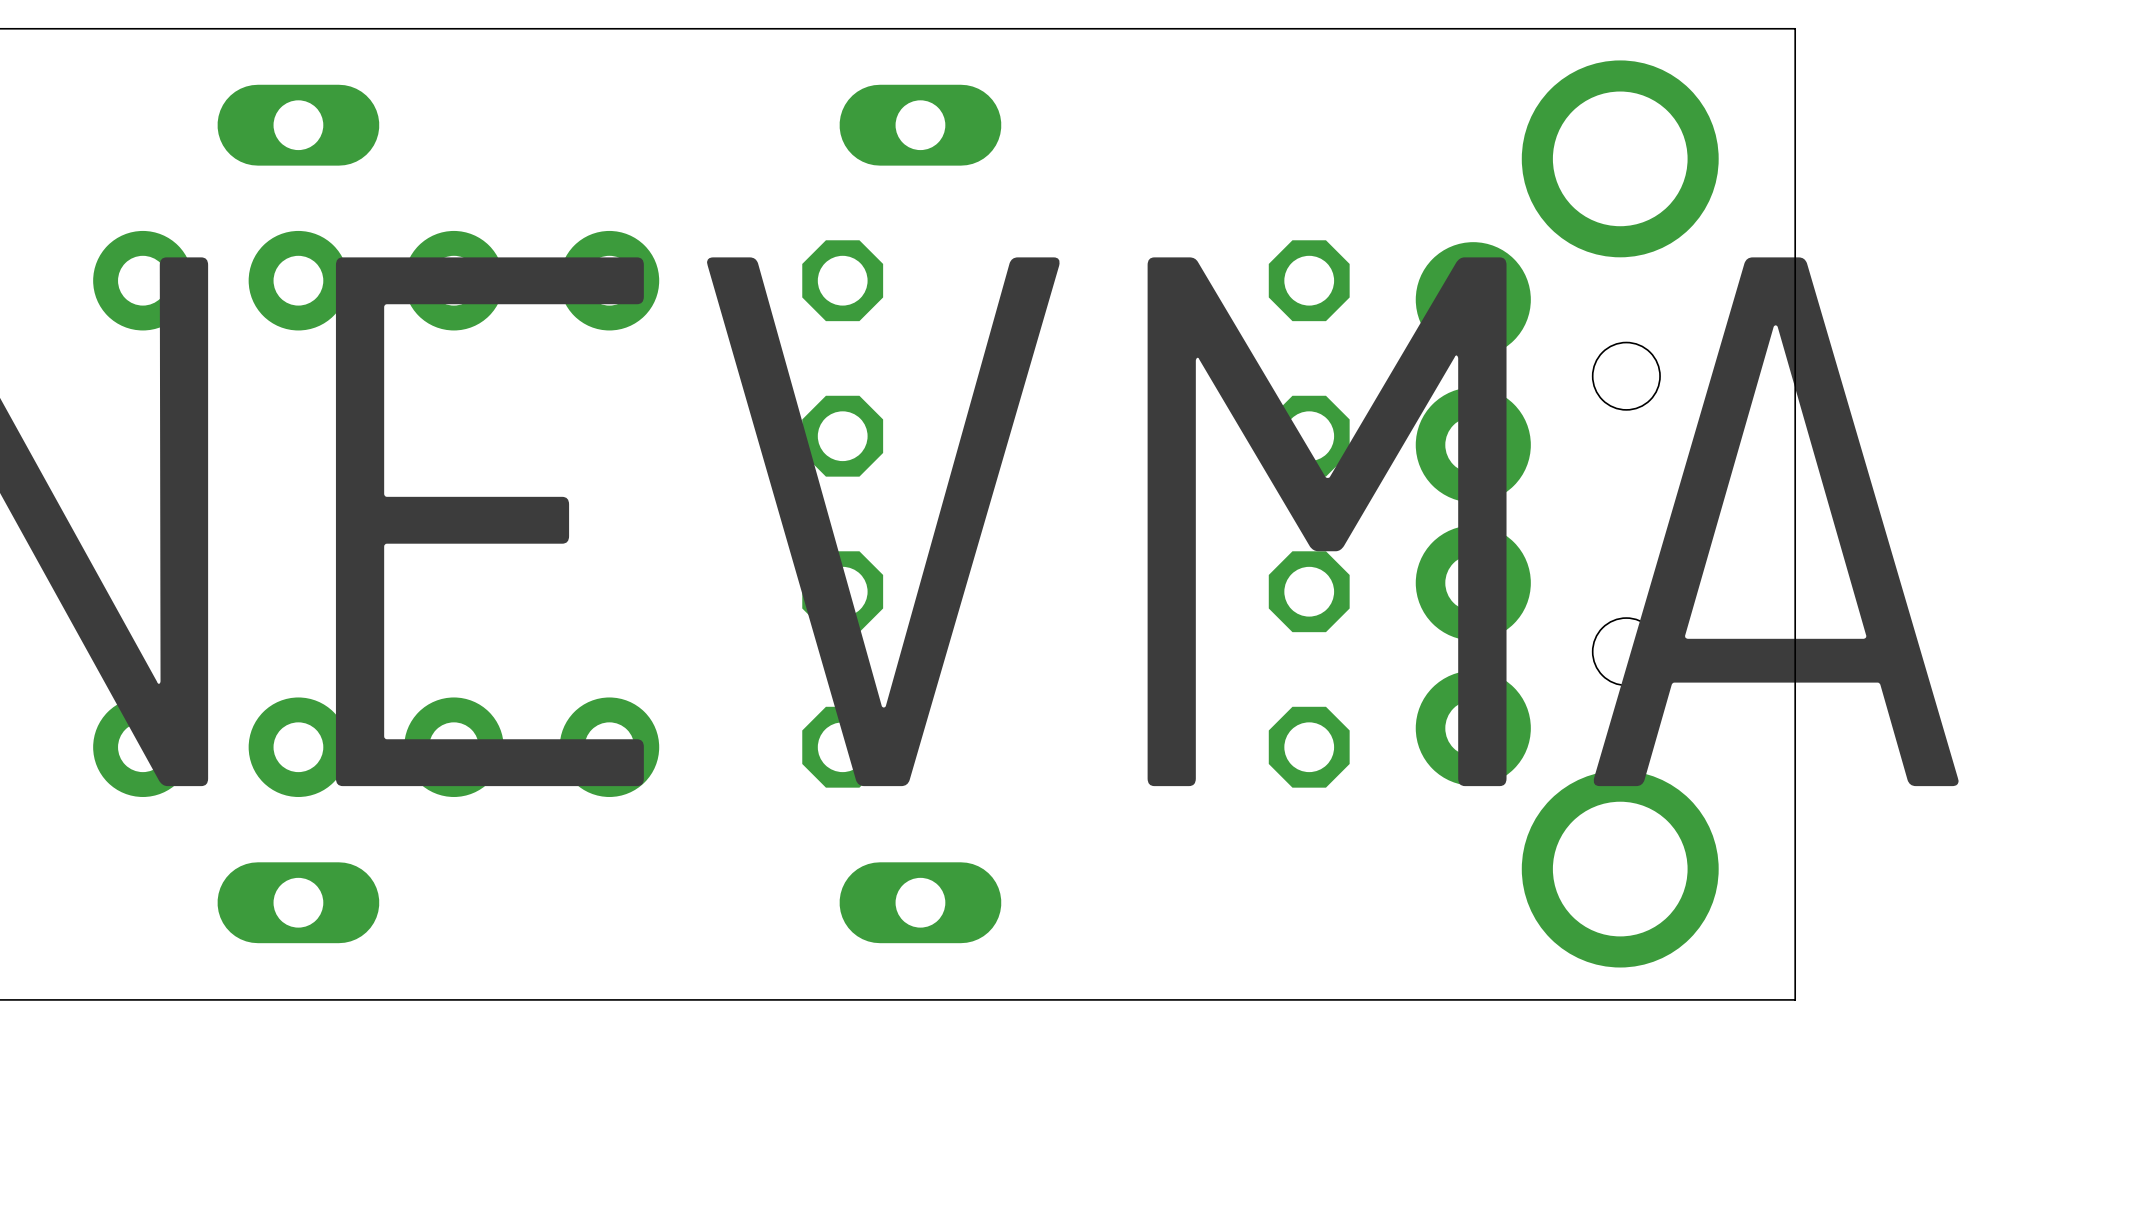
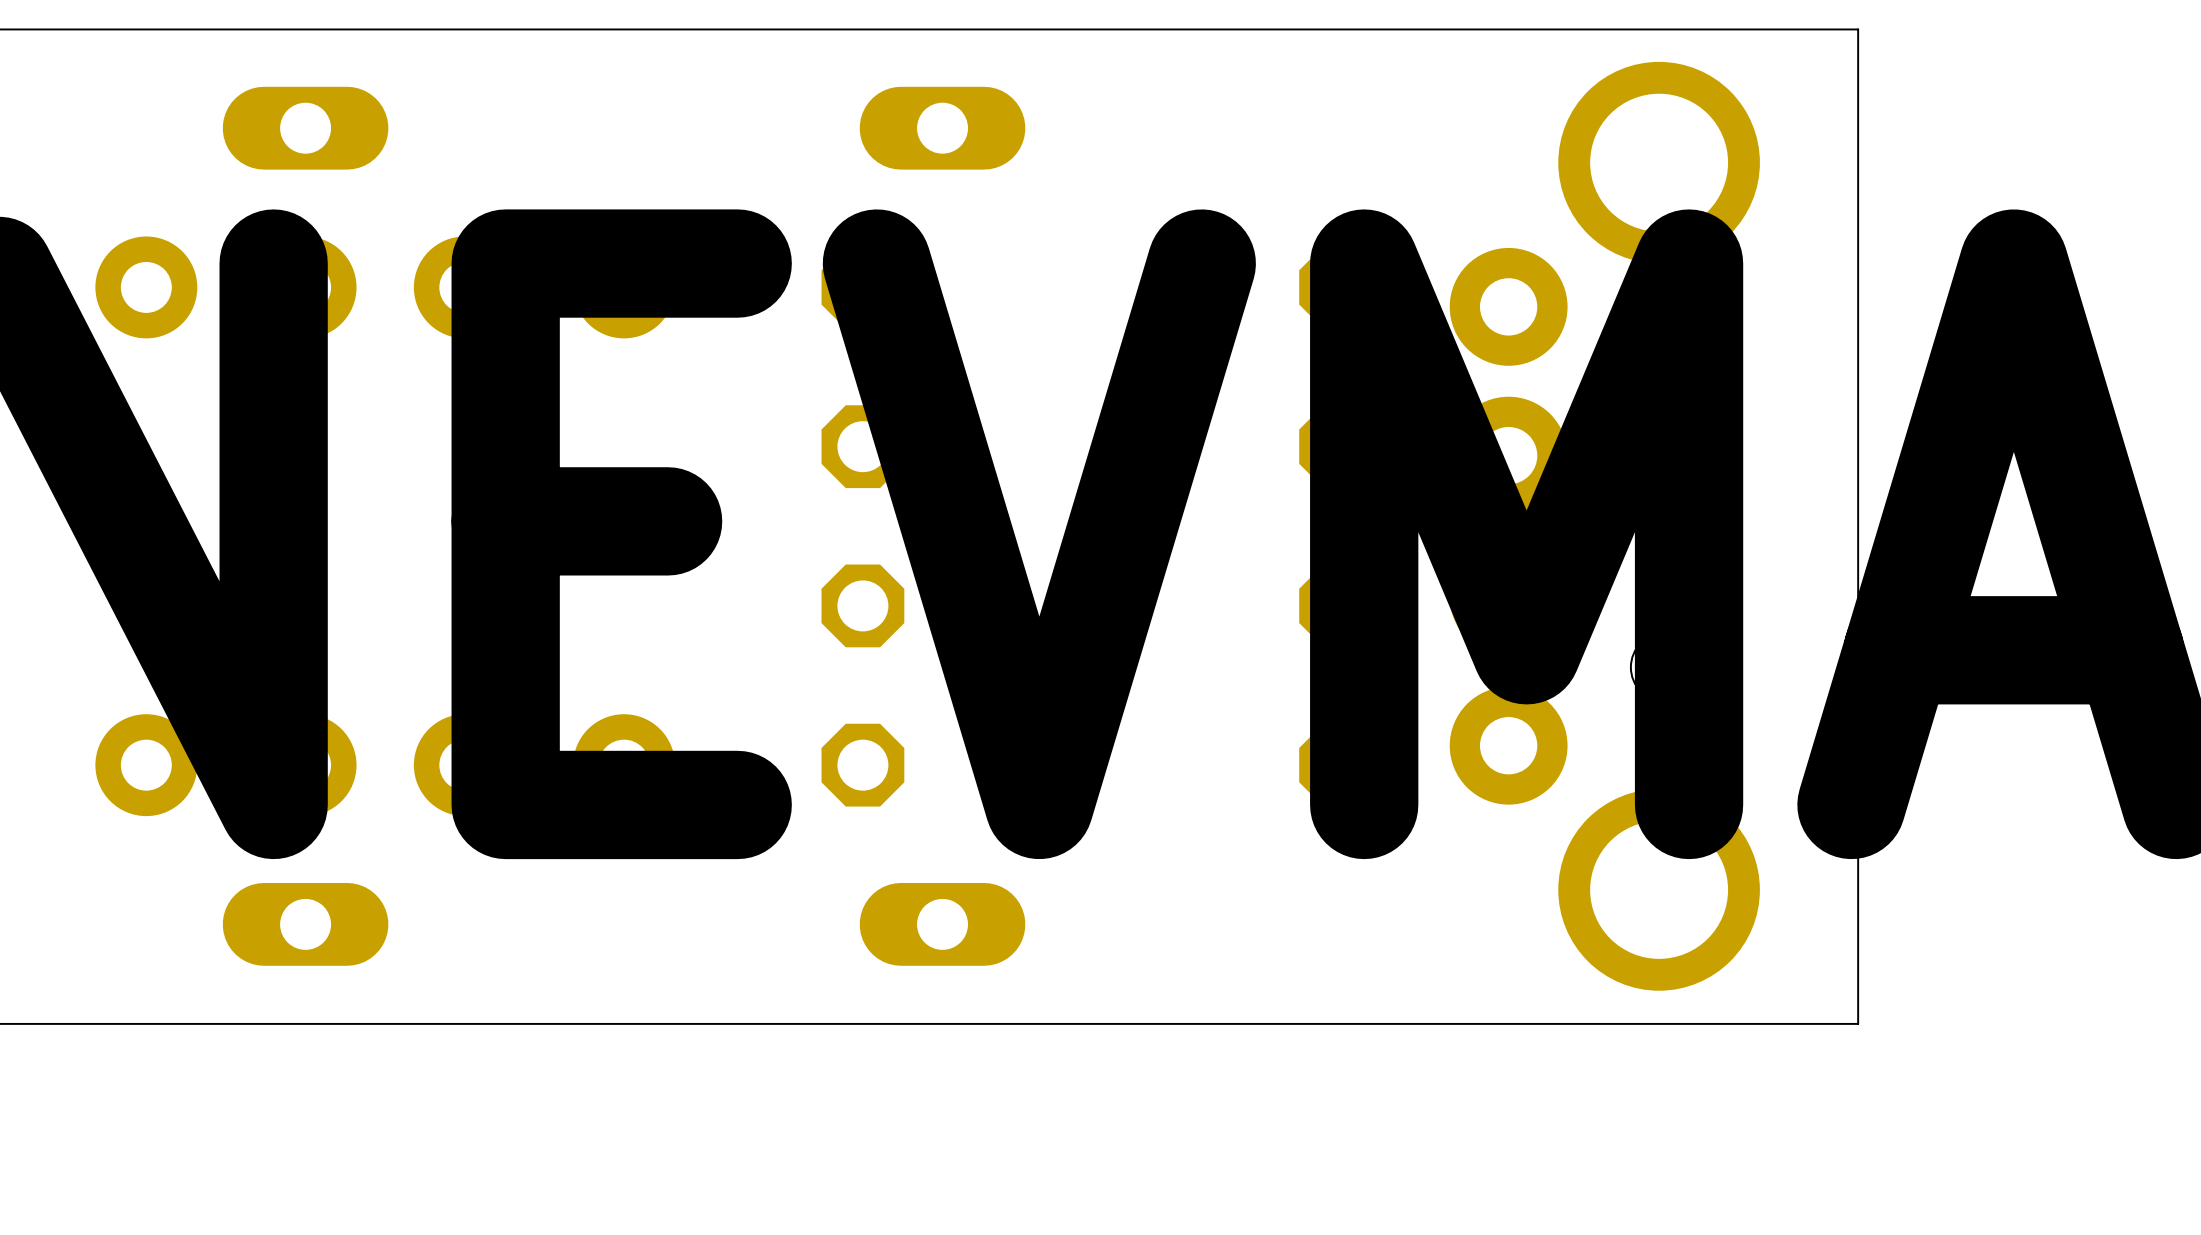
board edge: (1795, 28) (1795, 999) -> (1838, 29) (1858, 29) (1858, 1023) (1838, 1023)

